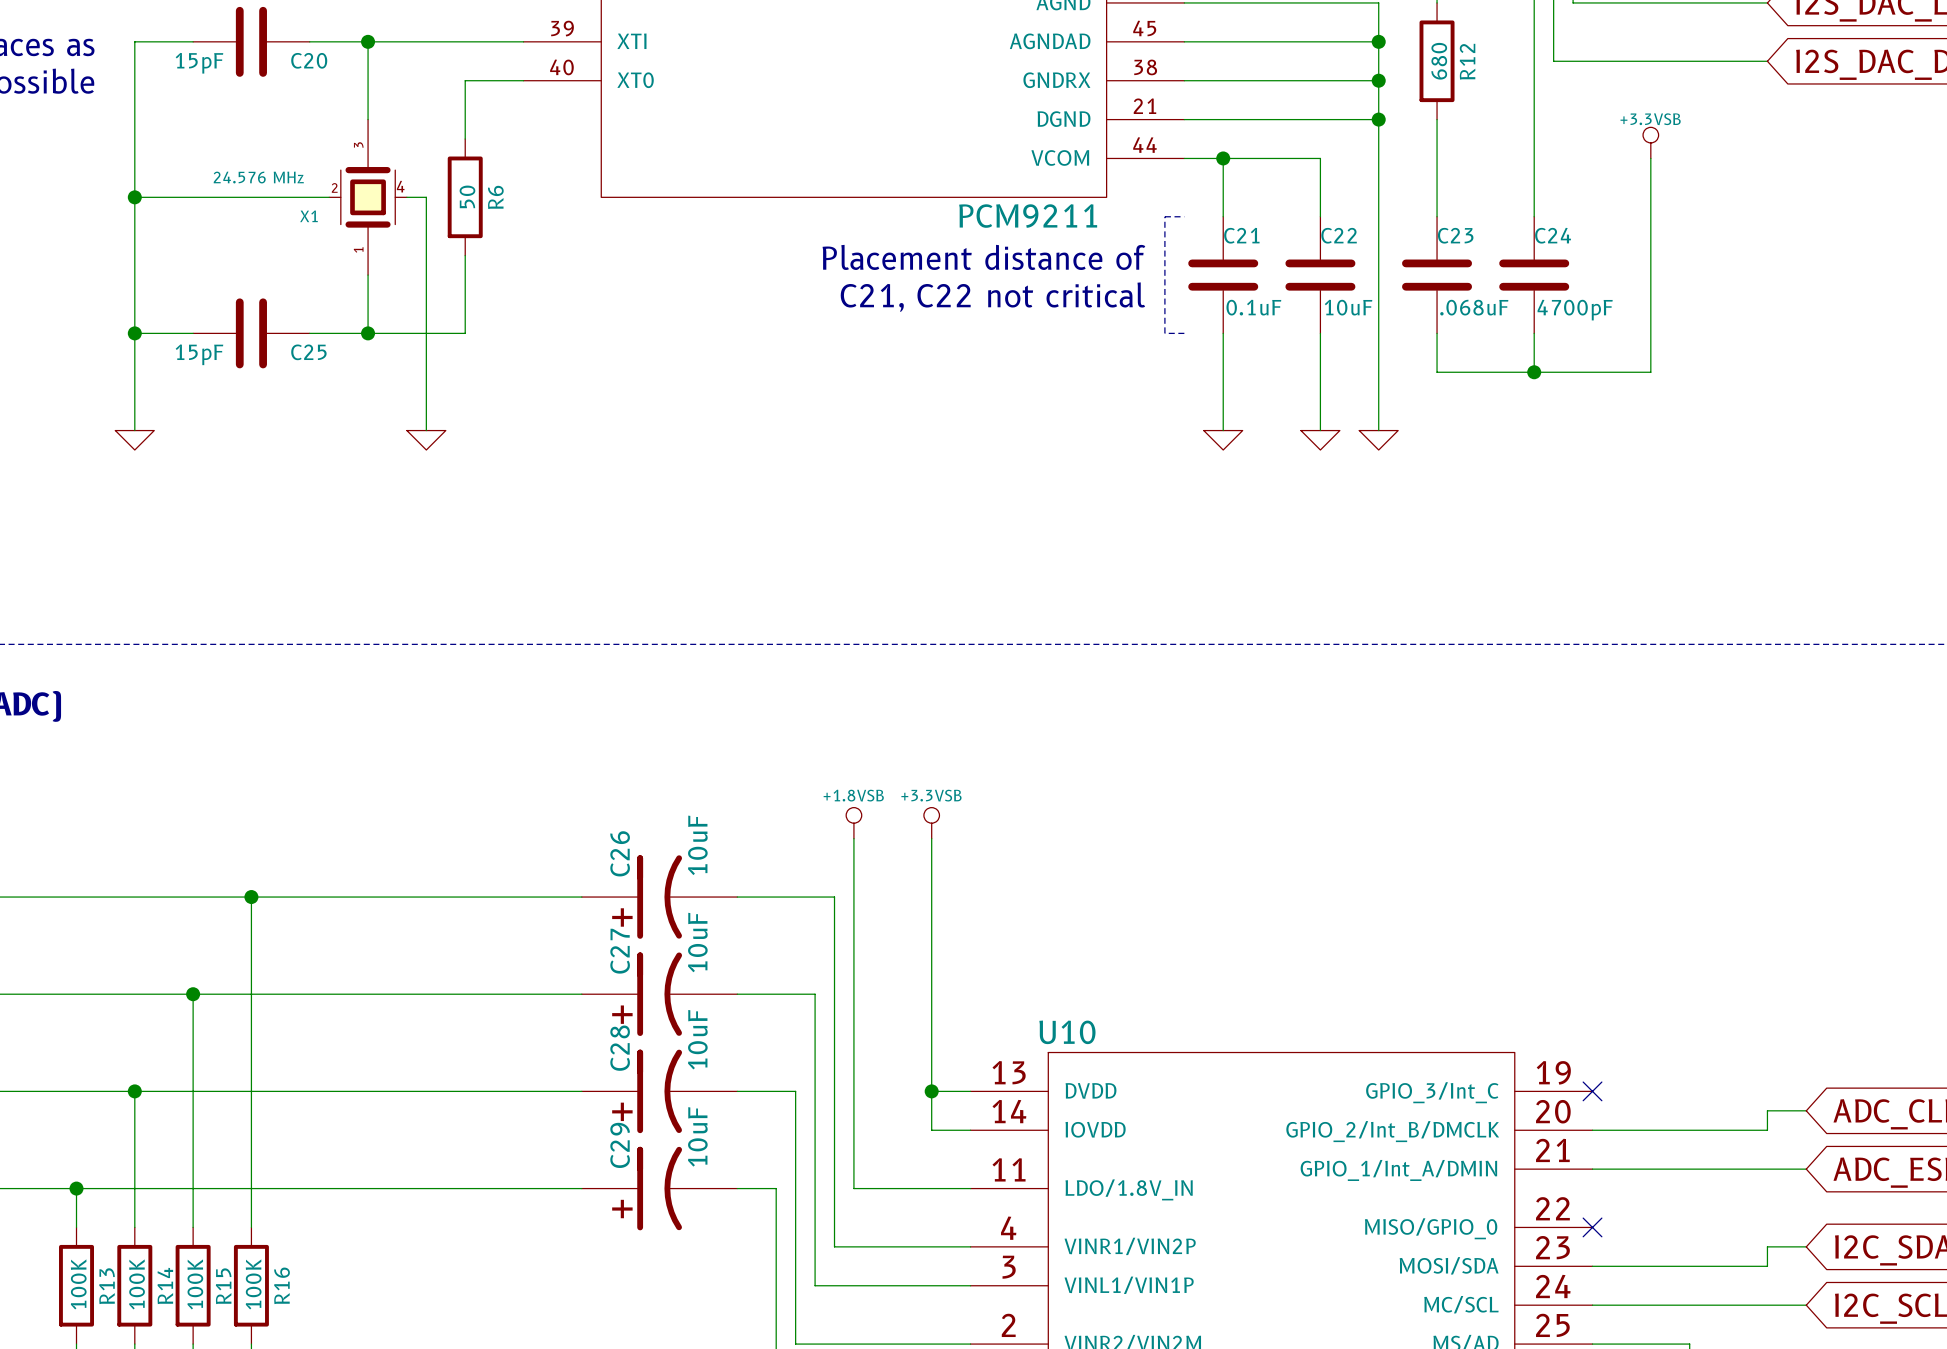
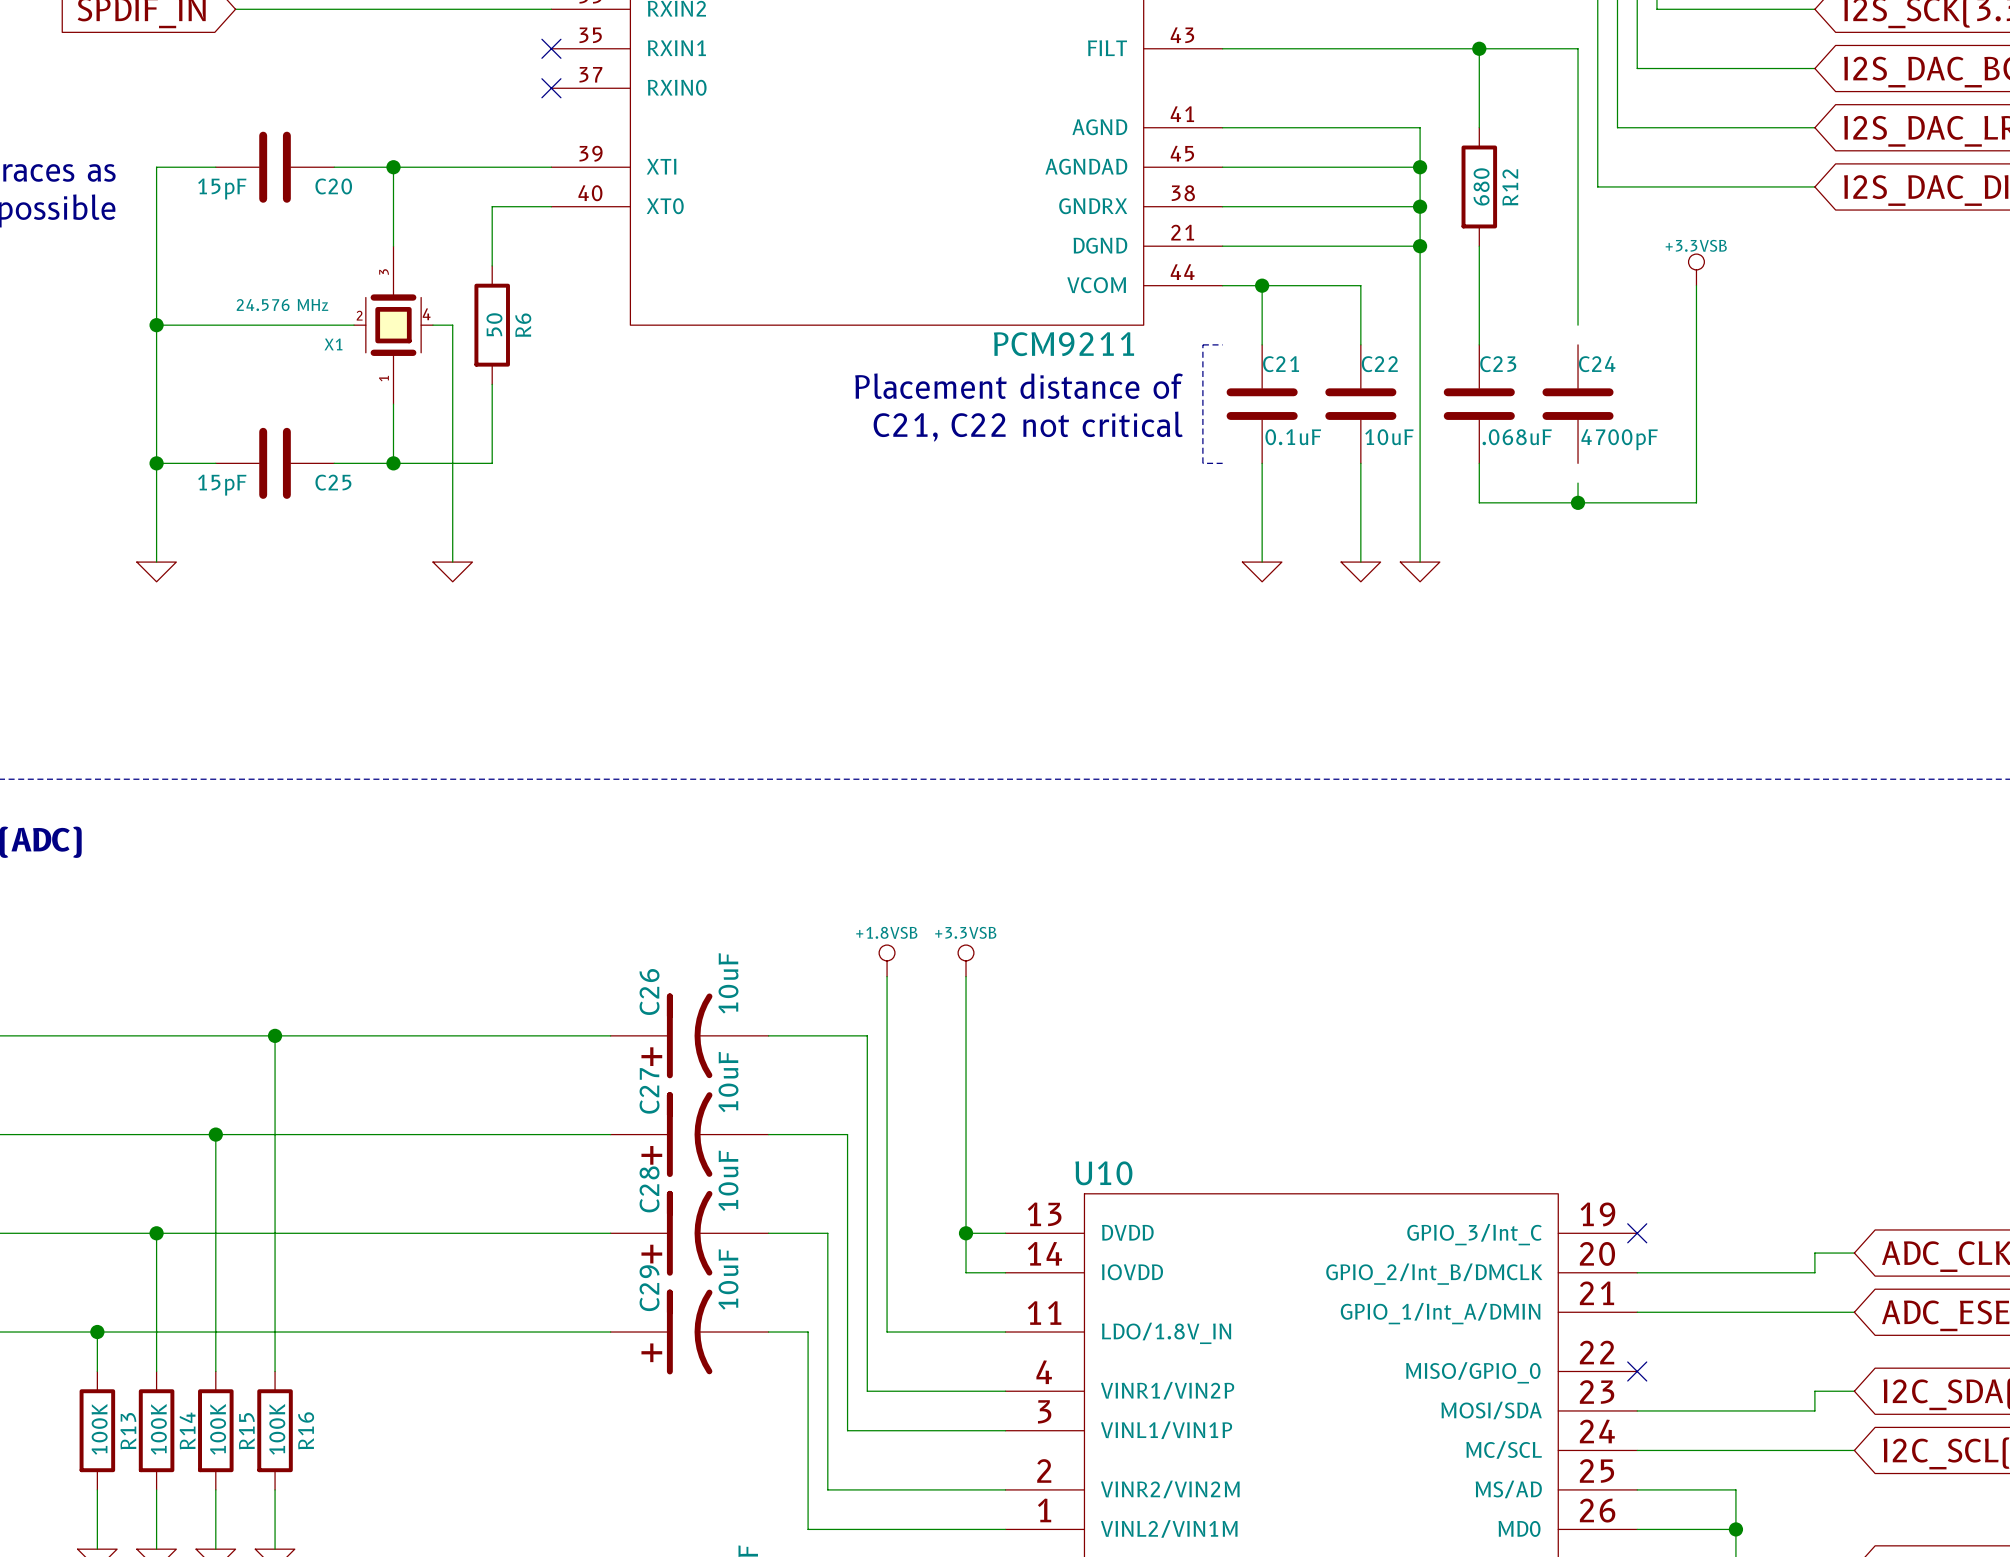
wire: (1534, 197) (1534, 216) -> none
wire: (1534, 333) (1534, 352) -> none

